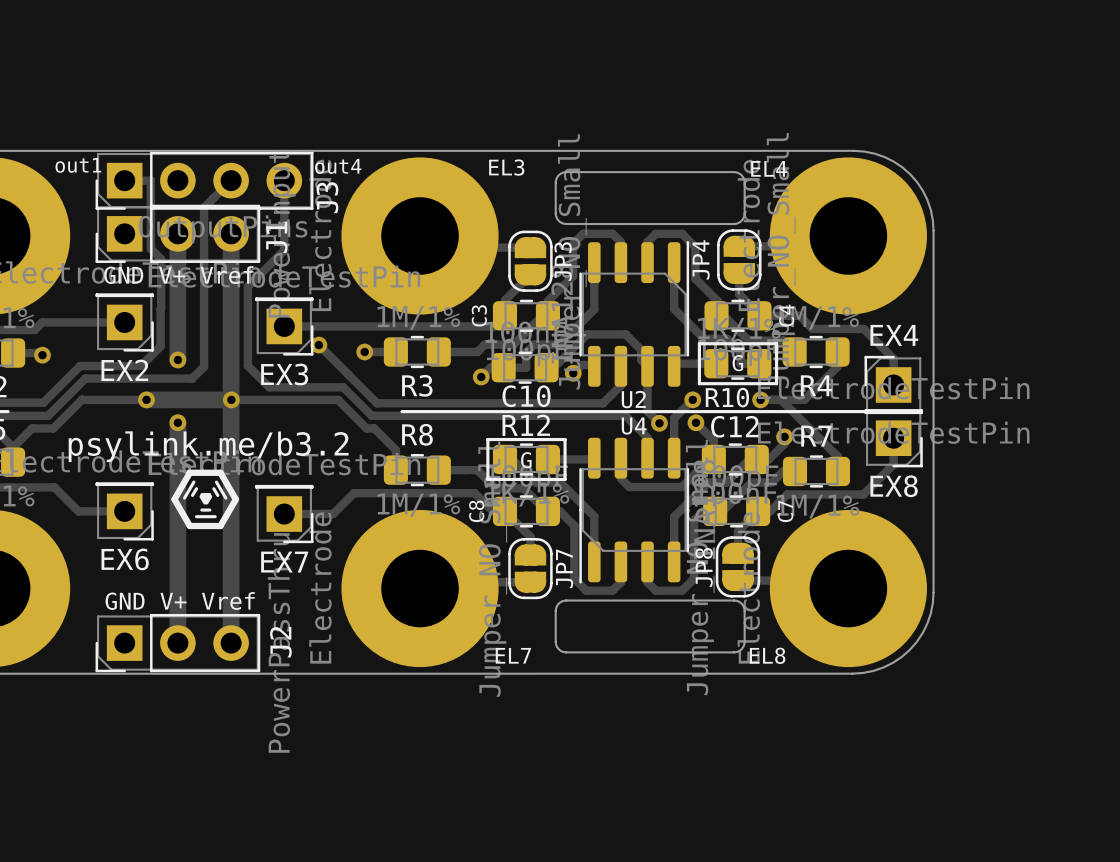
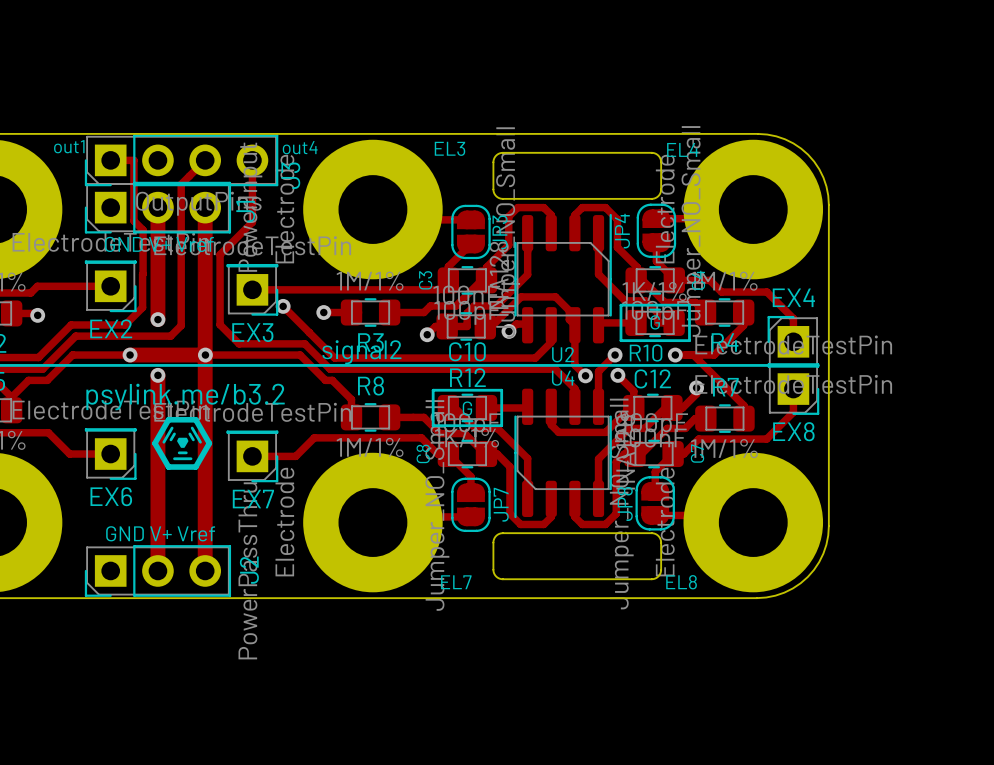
text: none -> signal2 (361, 352)
line: none -> (7, 365) (356, 365)

